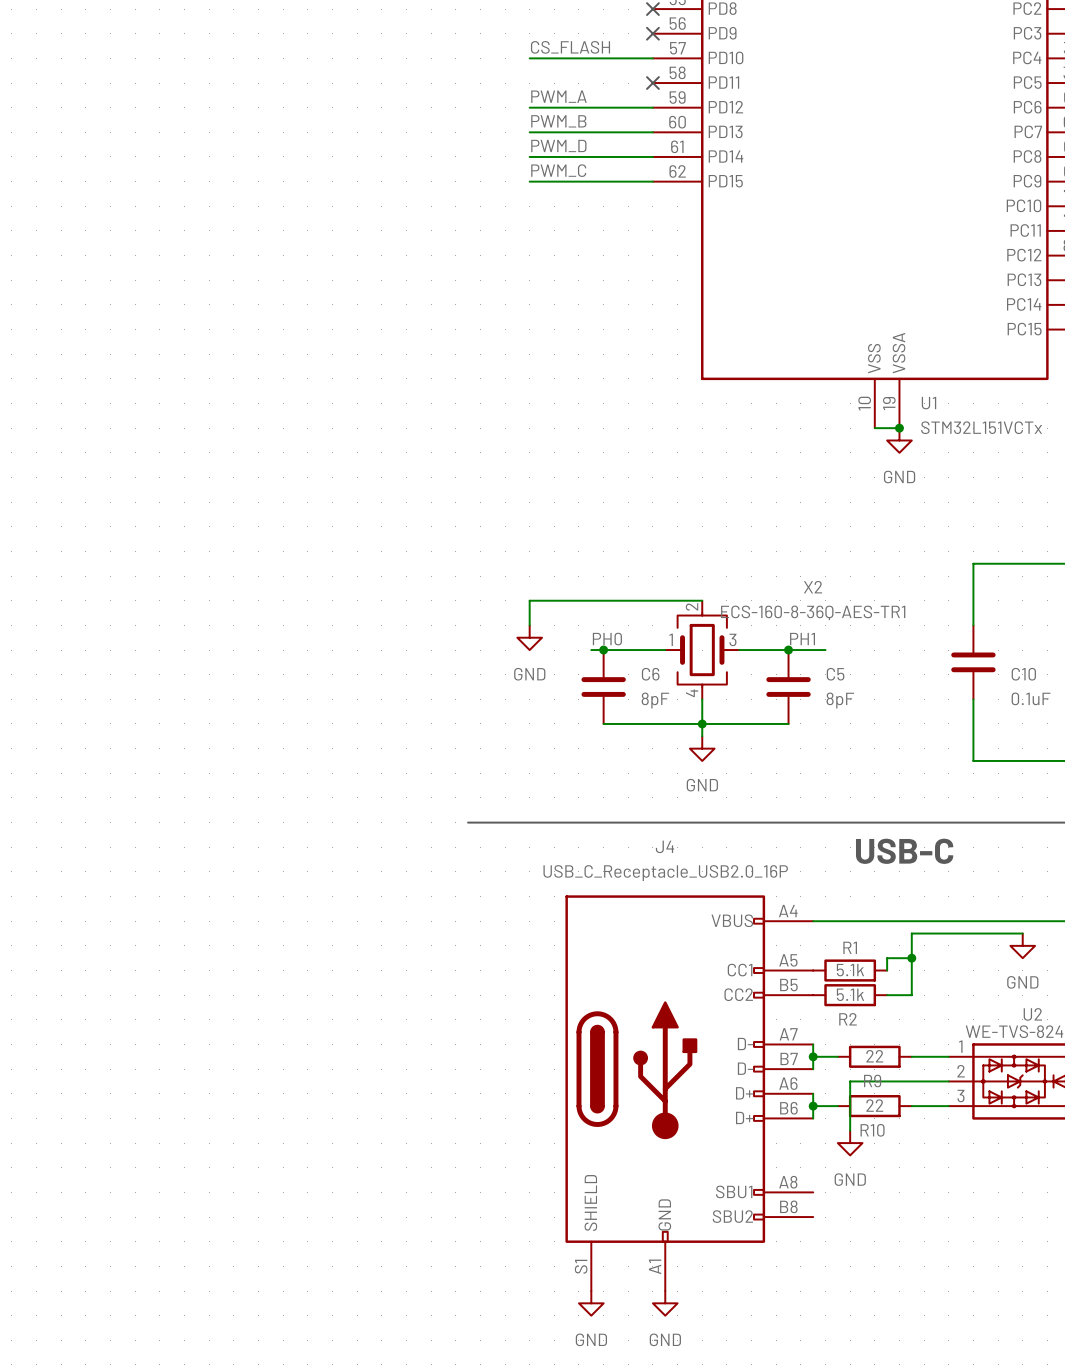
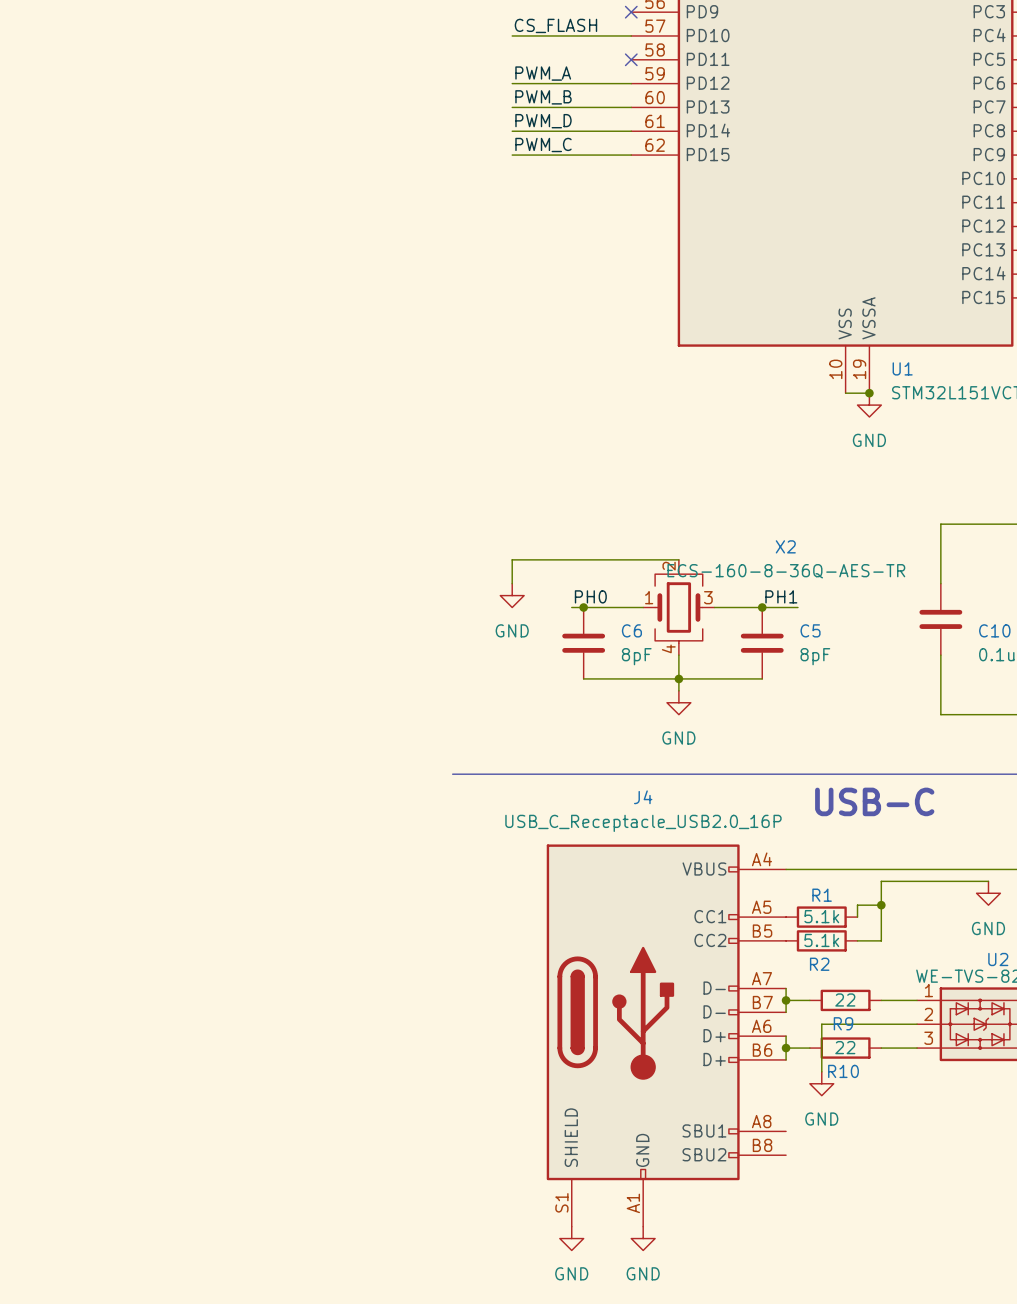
X2 value: ECS-160-8-36Q-AES-TR1 (813, 612) -> ECS-160-8-36Q-AES-TR (786, 571)

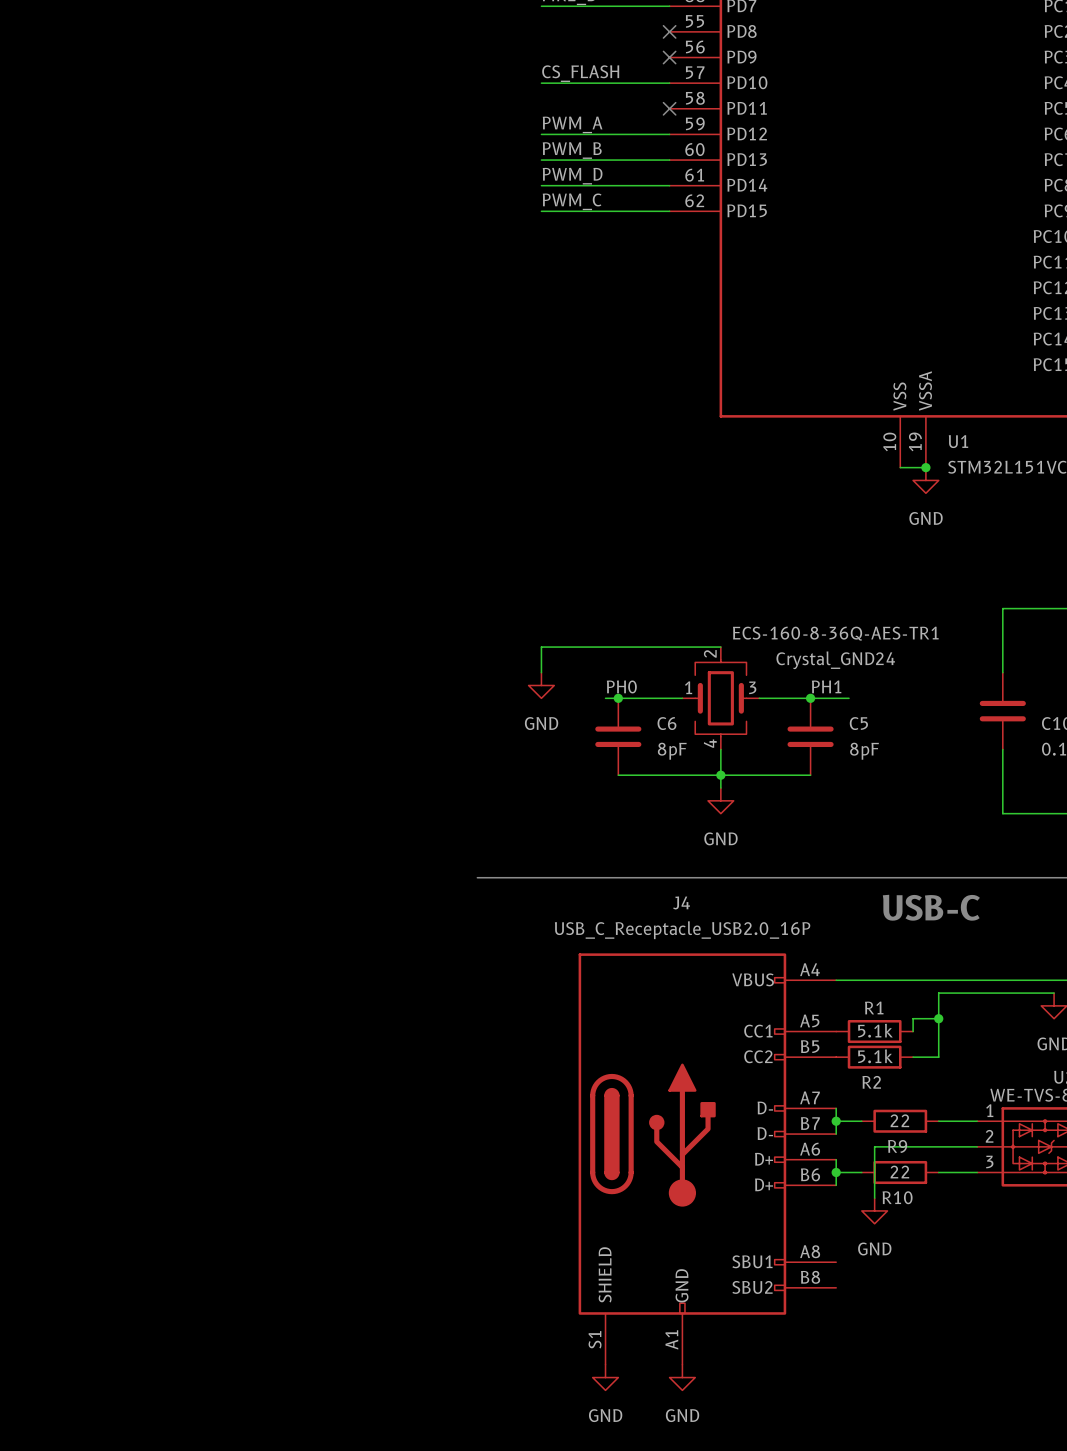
X2 name: X2 (785, 546) -> ECS-160-8-36Q-AES-TR1 (835, 633)
X2 value: ECS-160-8-36Q-AES-TR (786, 571) -> Crystal_GND24 (835, 660)

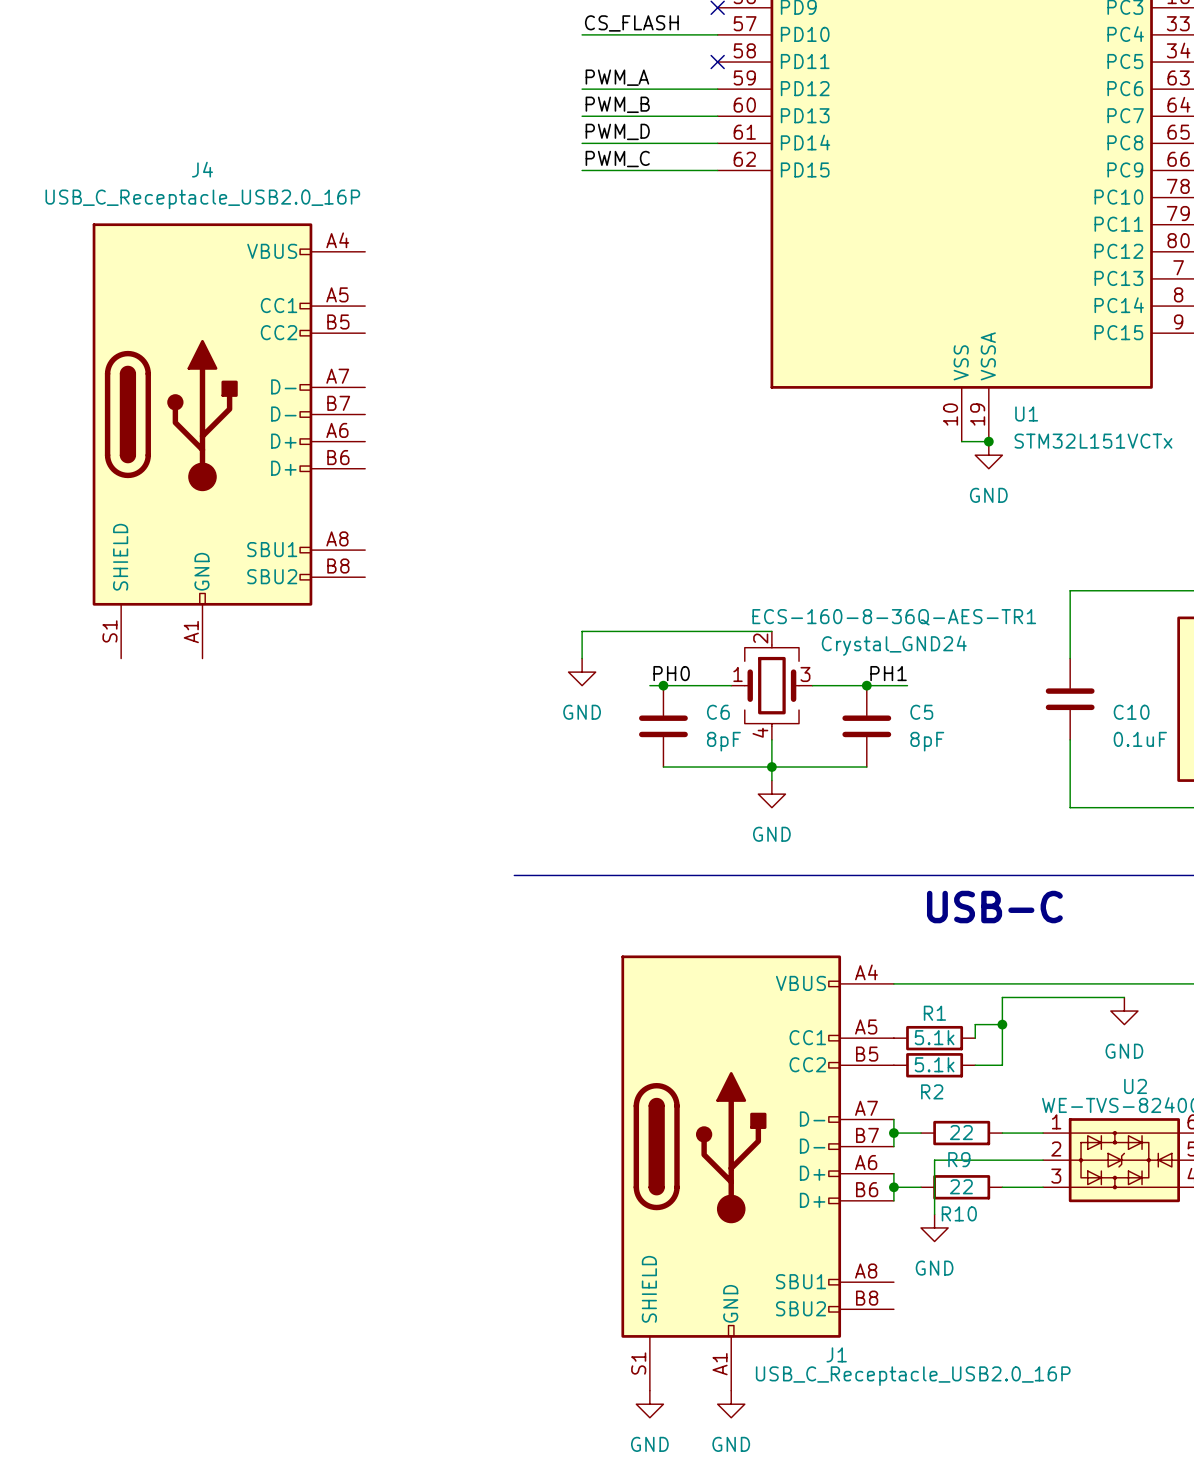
J4: none -> USB_C_Receptacle_USB2.0_16P (228, 440)
J4 name: J4 (681, 902) -> J1 (836, 1354)
J4 value position: USB_C_Receptacle_USB2.0_16P (682, 930) -> USB_C_Receptacle_USB2.0_16P (913, 1376)

